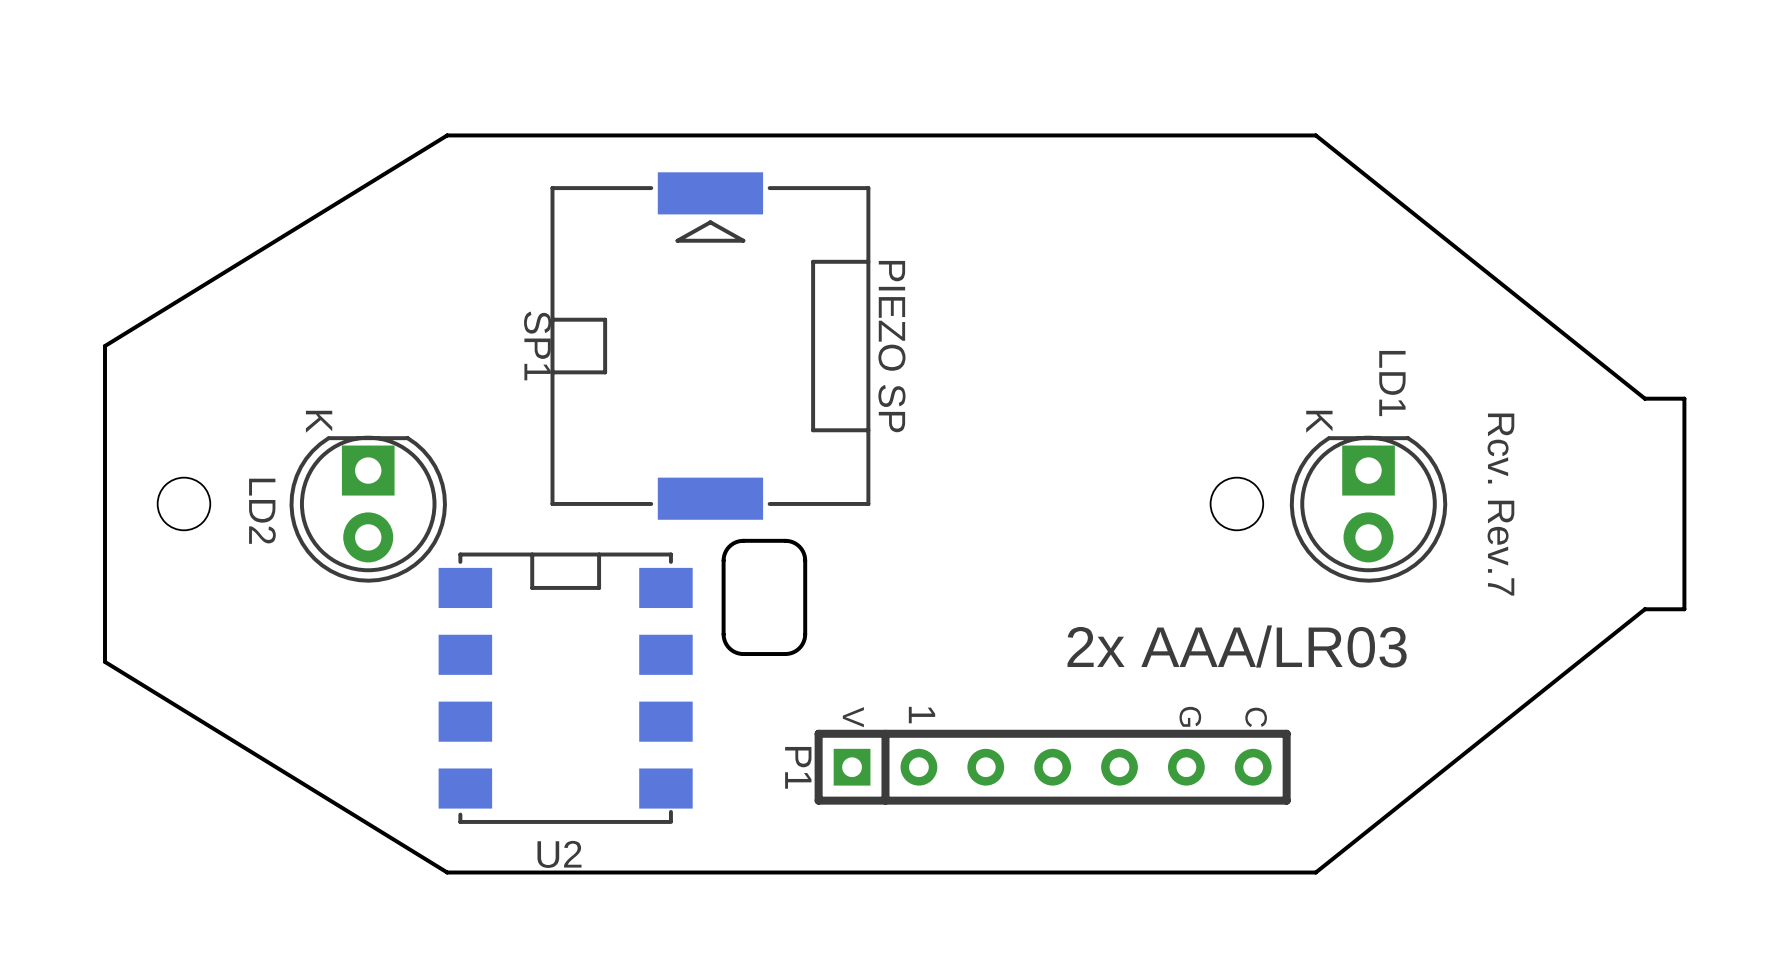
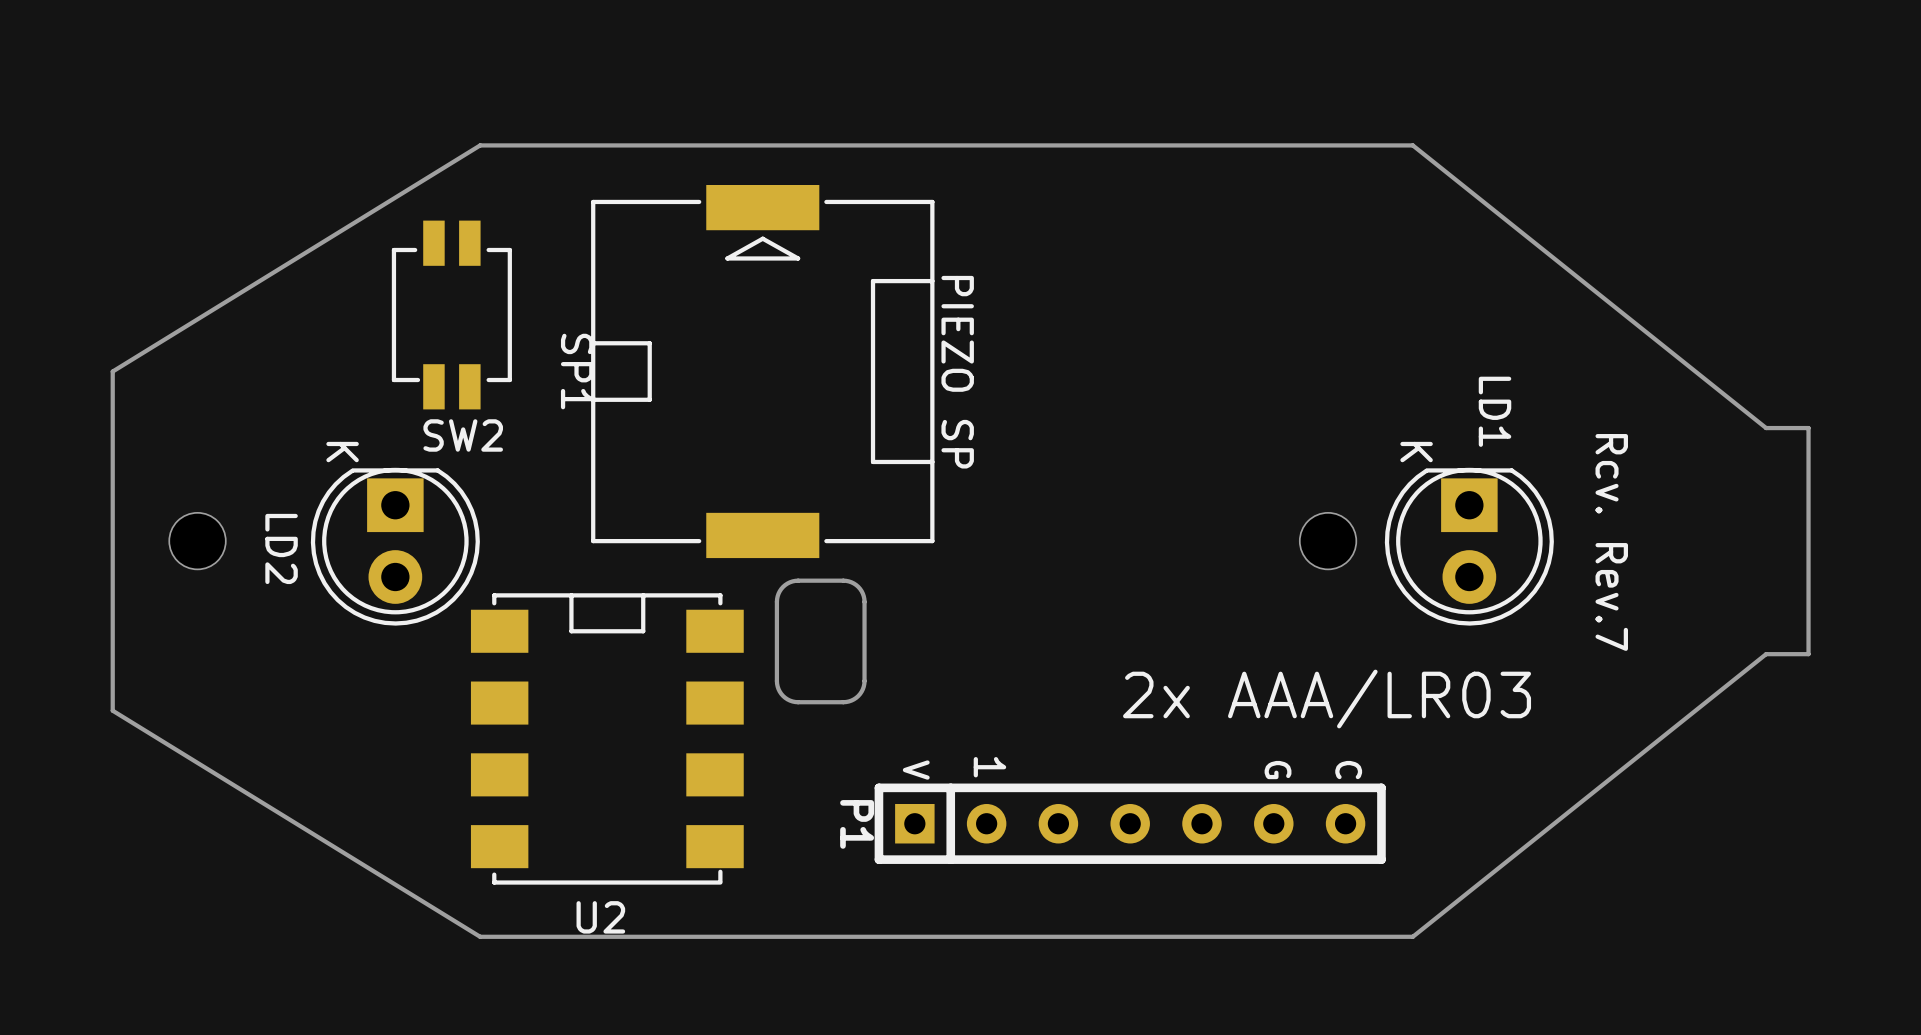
SW2: none -> (451, 315)

